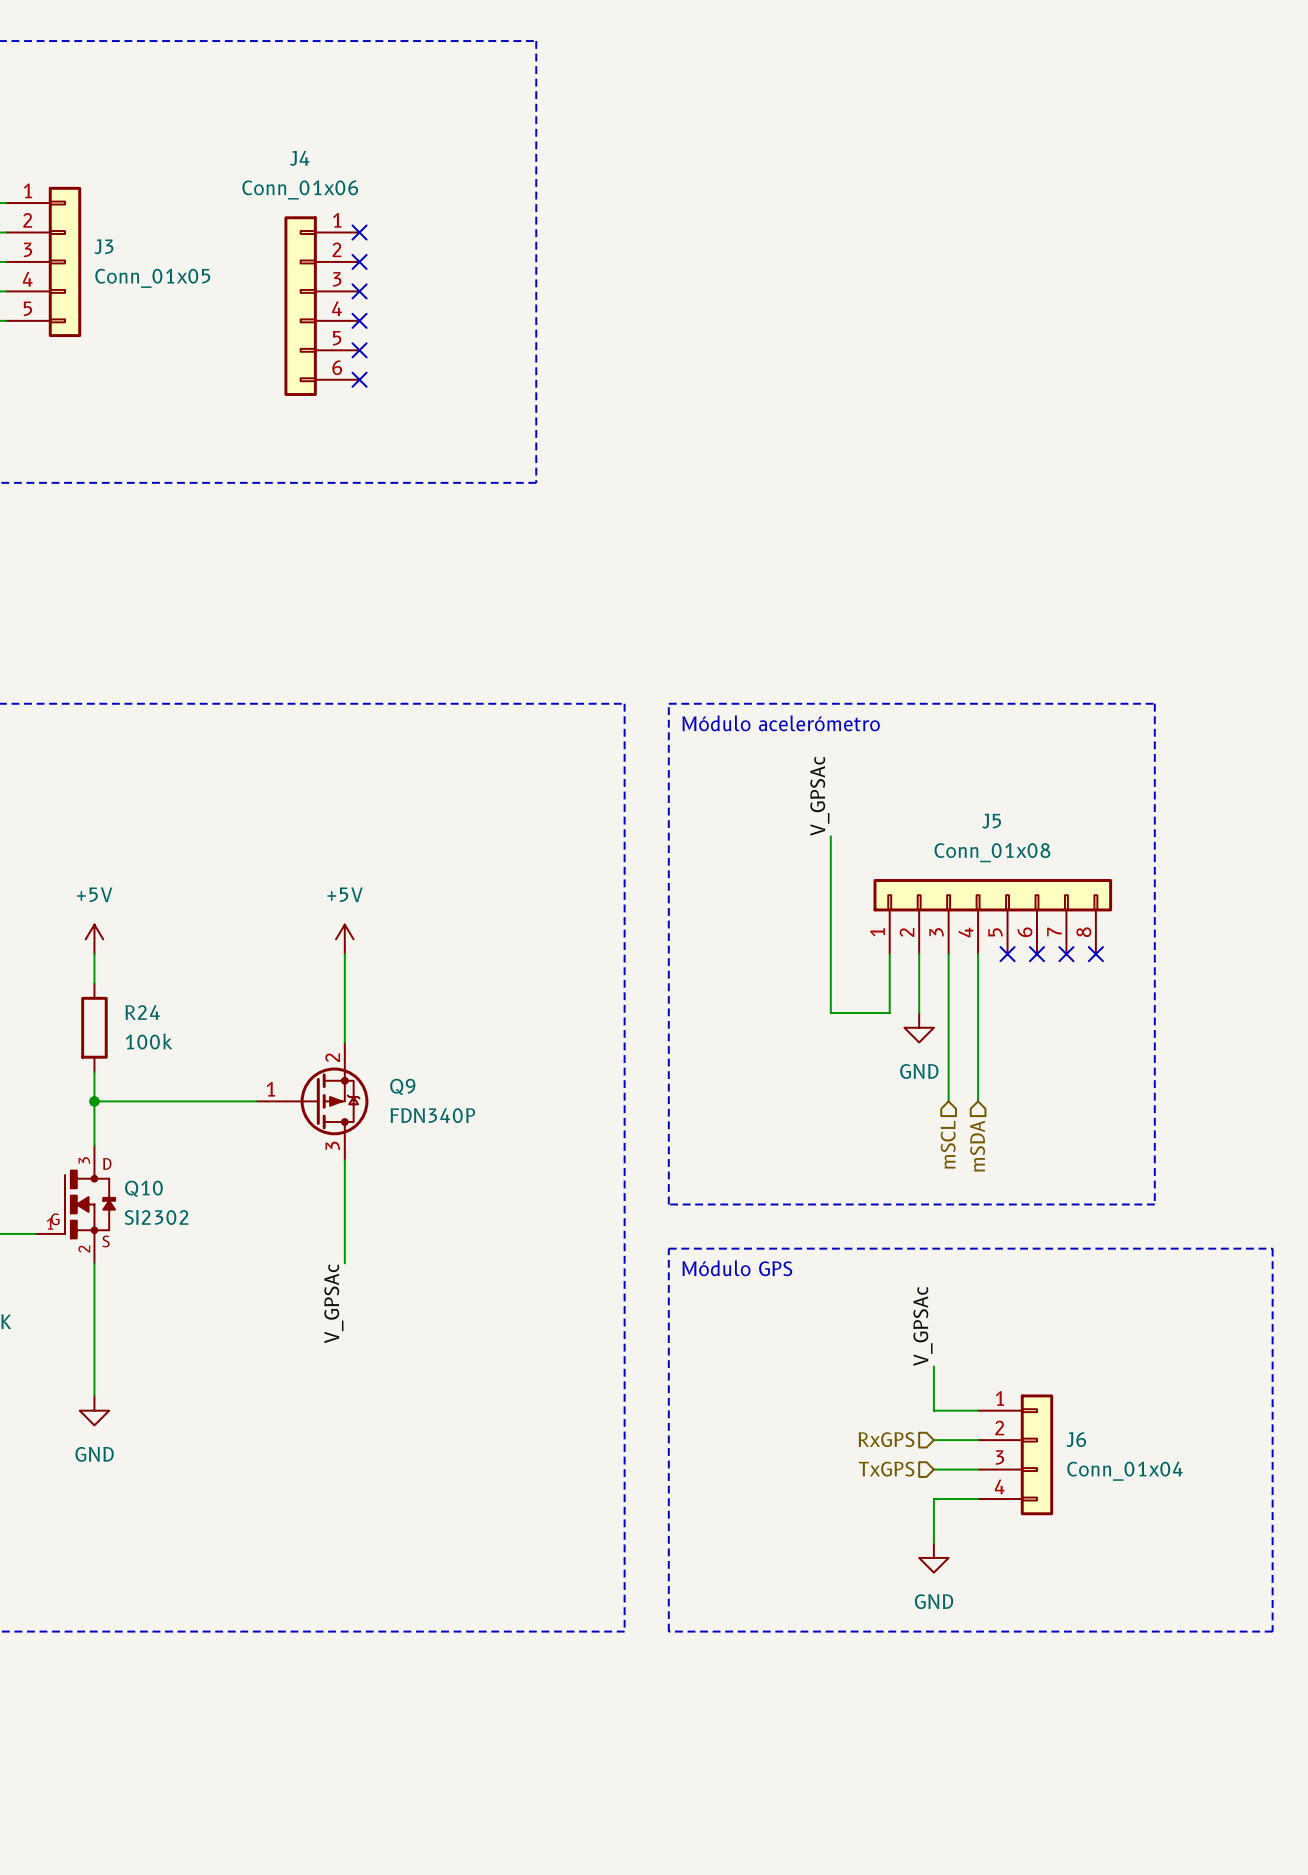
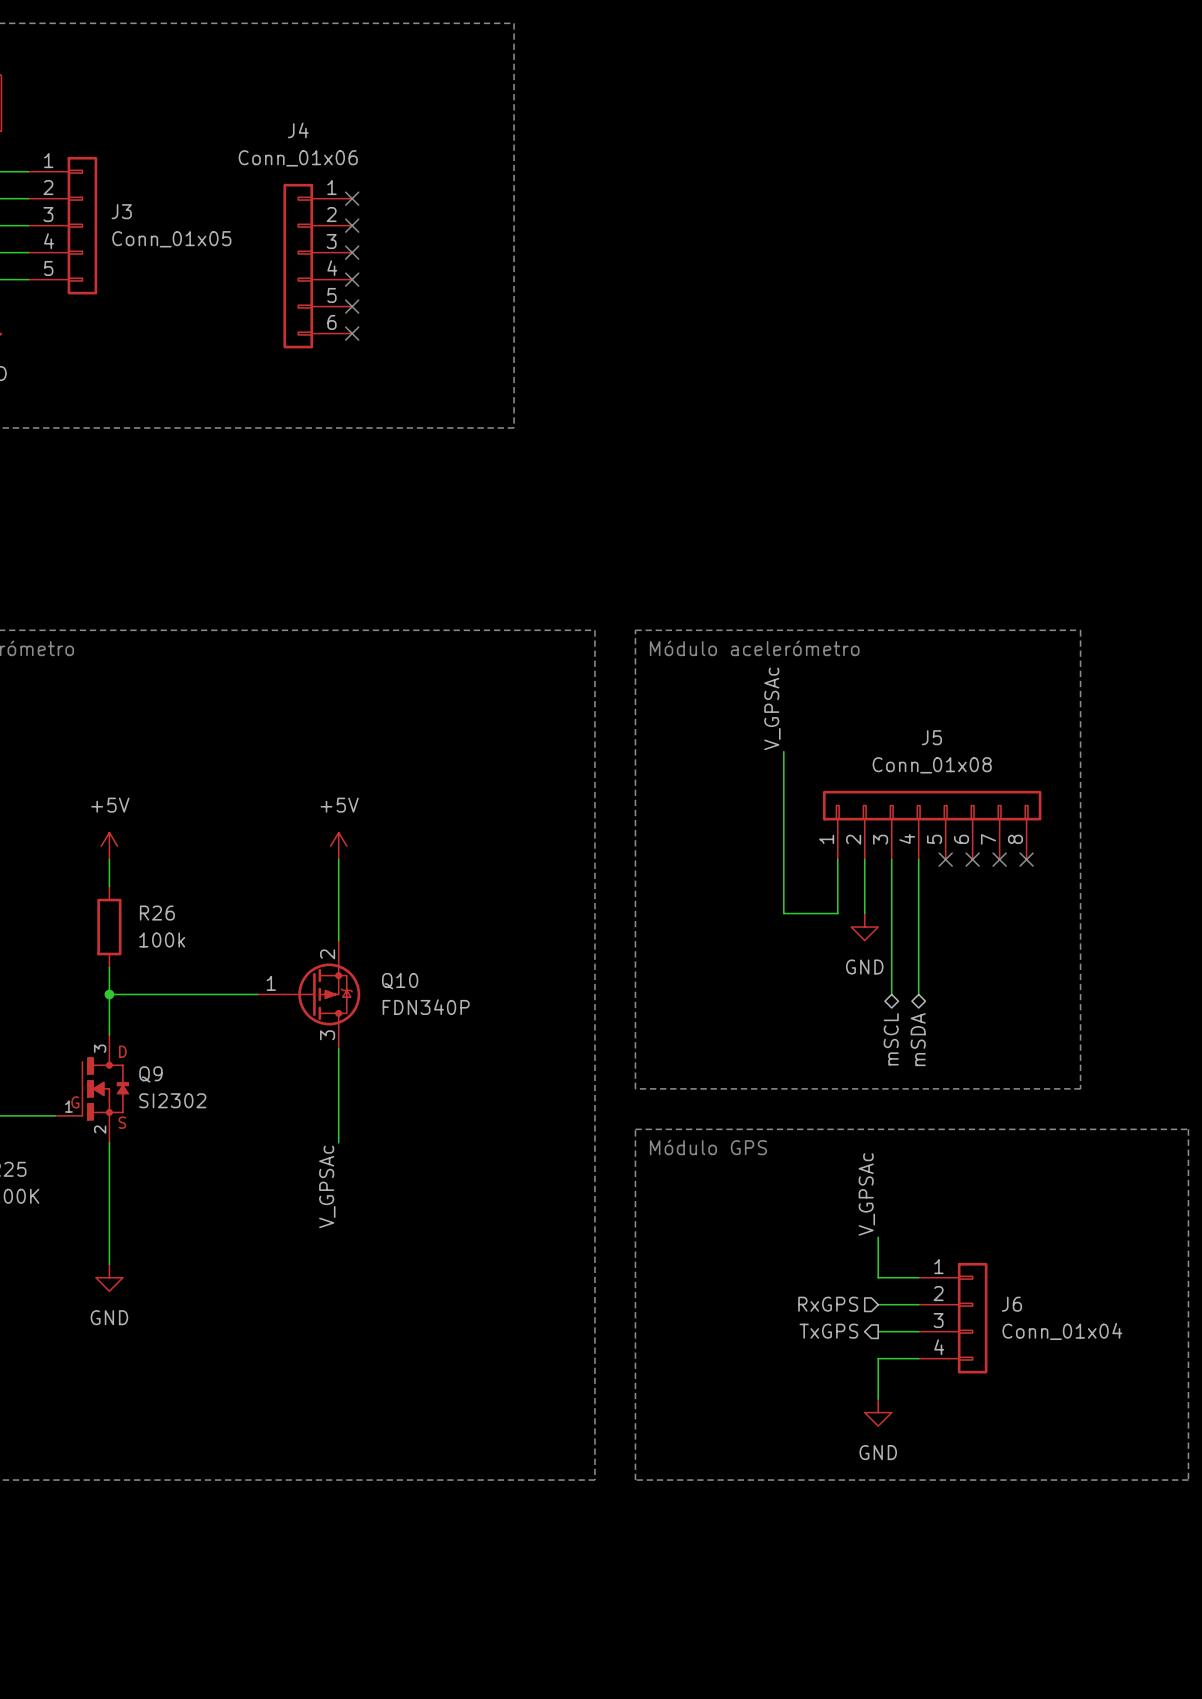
R24 name: R24 (142, 1012) -> R26 (157, 913)
Q9 name: Q9 (402, 1086) -> Q10 (400, 981)
hierarchical label shape: input (948, 1144) -> bidirectional (891, 1039)
hierarchical label shape: input (977, 1146) -> bidirectional (918, 1039)
Q10 name: Q10 (143, 1188) -> Q9 (150, 1074)
hierarchical label shape: input (886, 1469) -> output (828, 1331)

